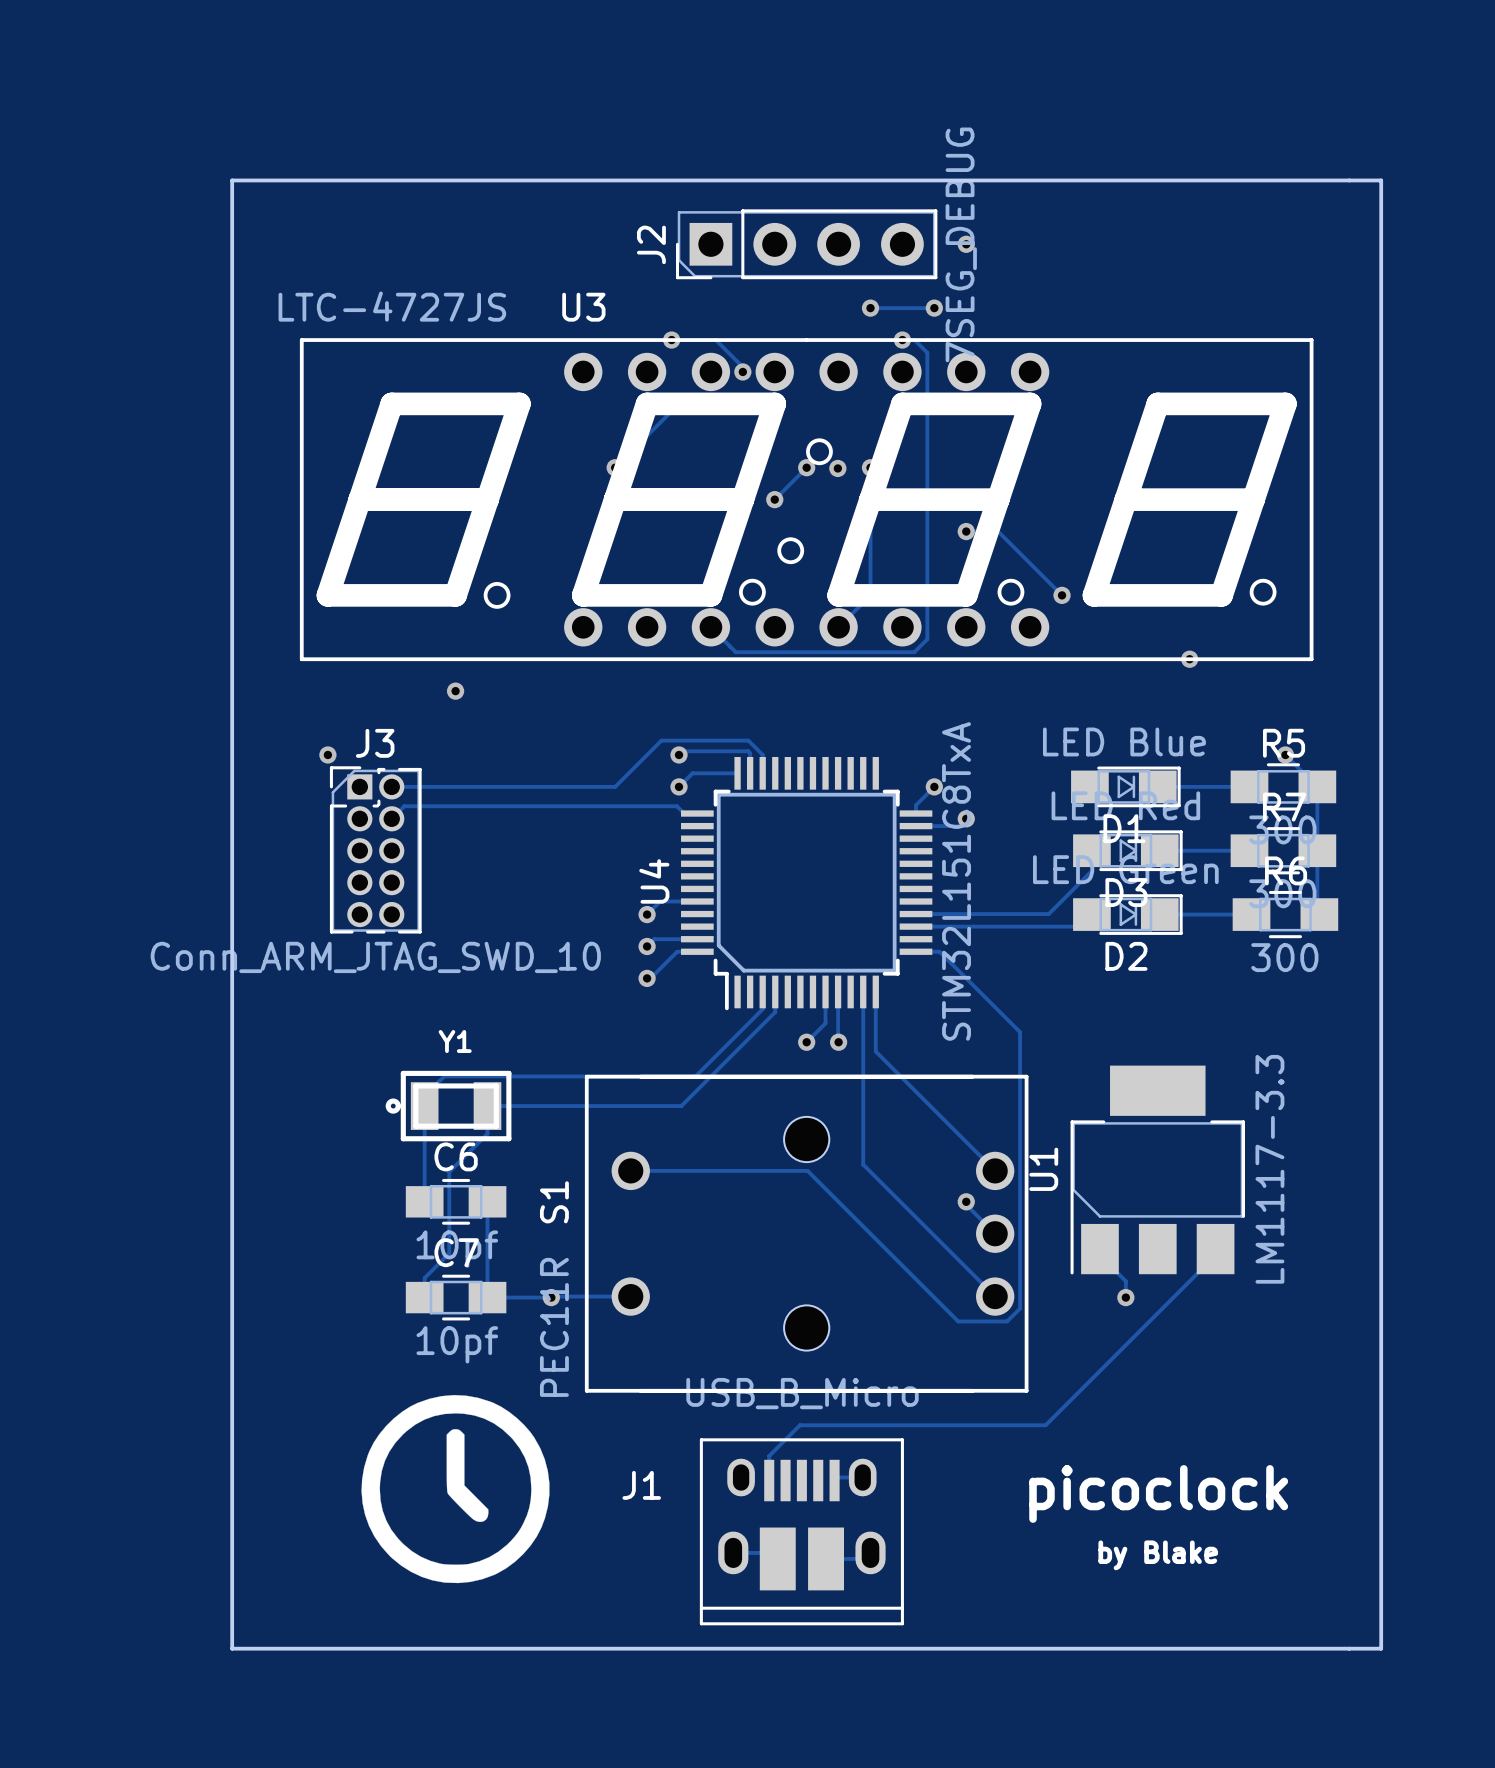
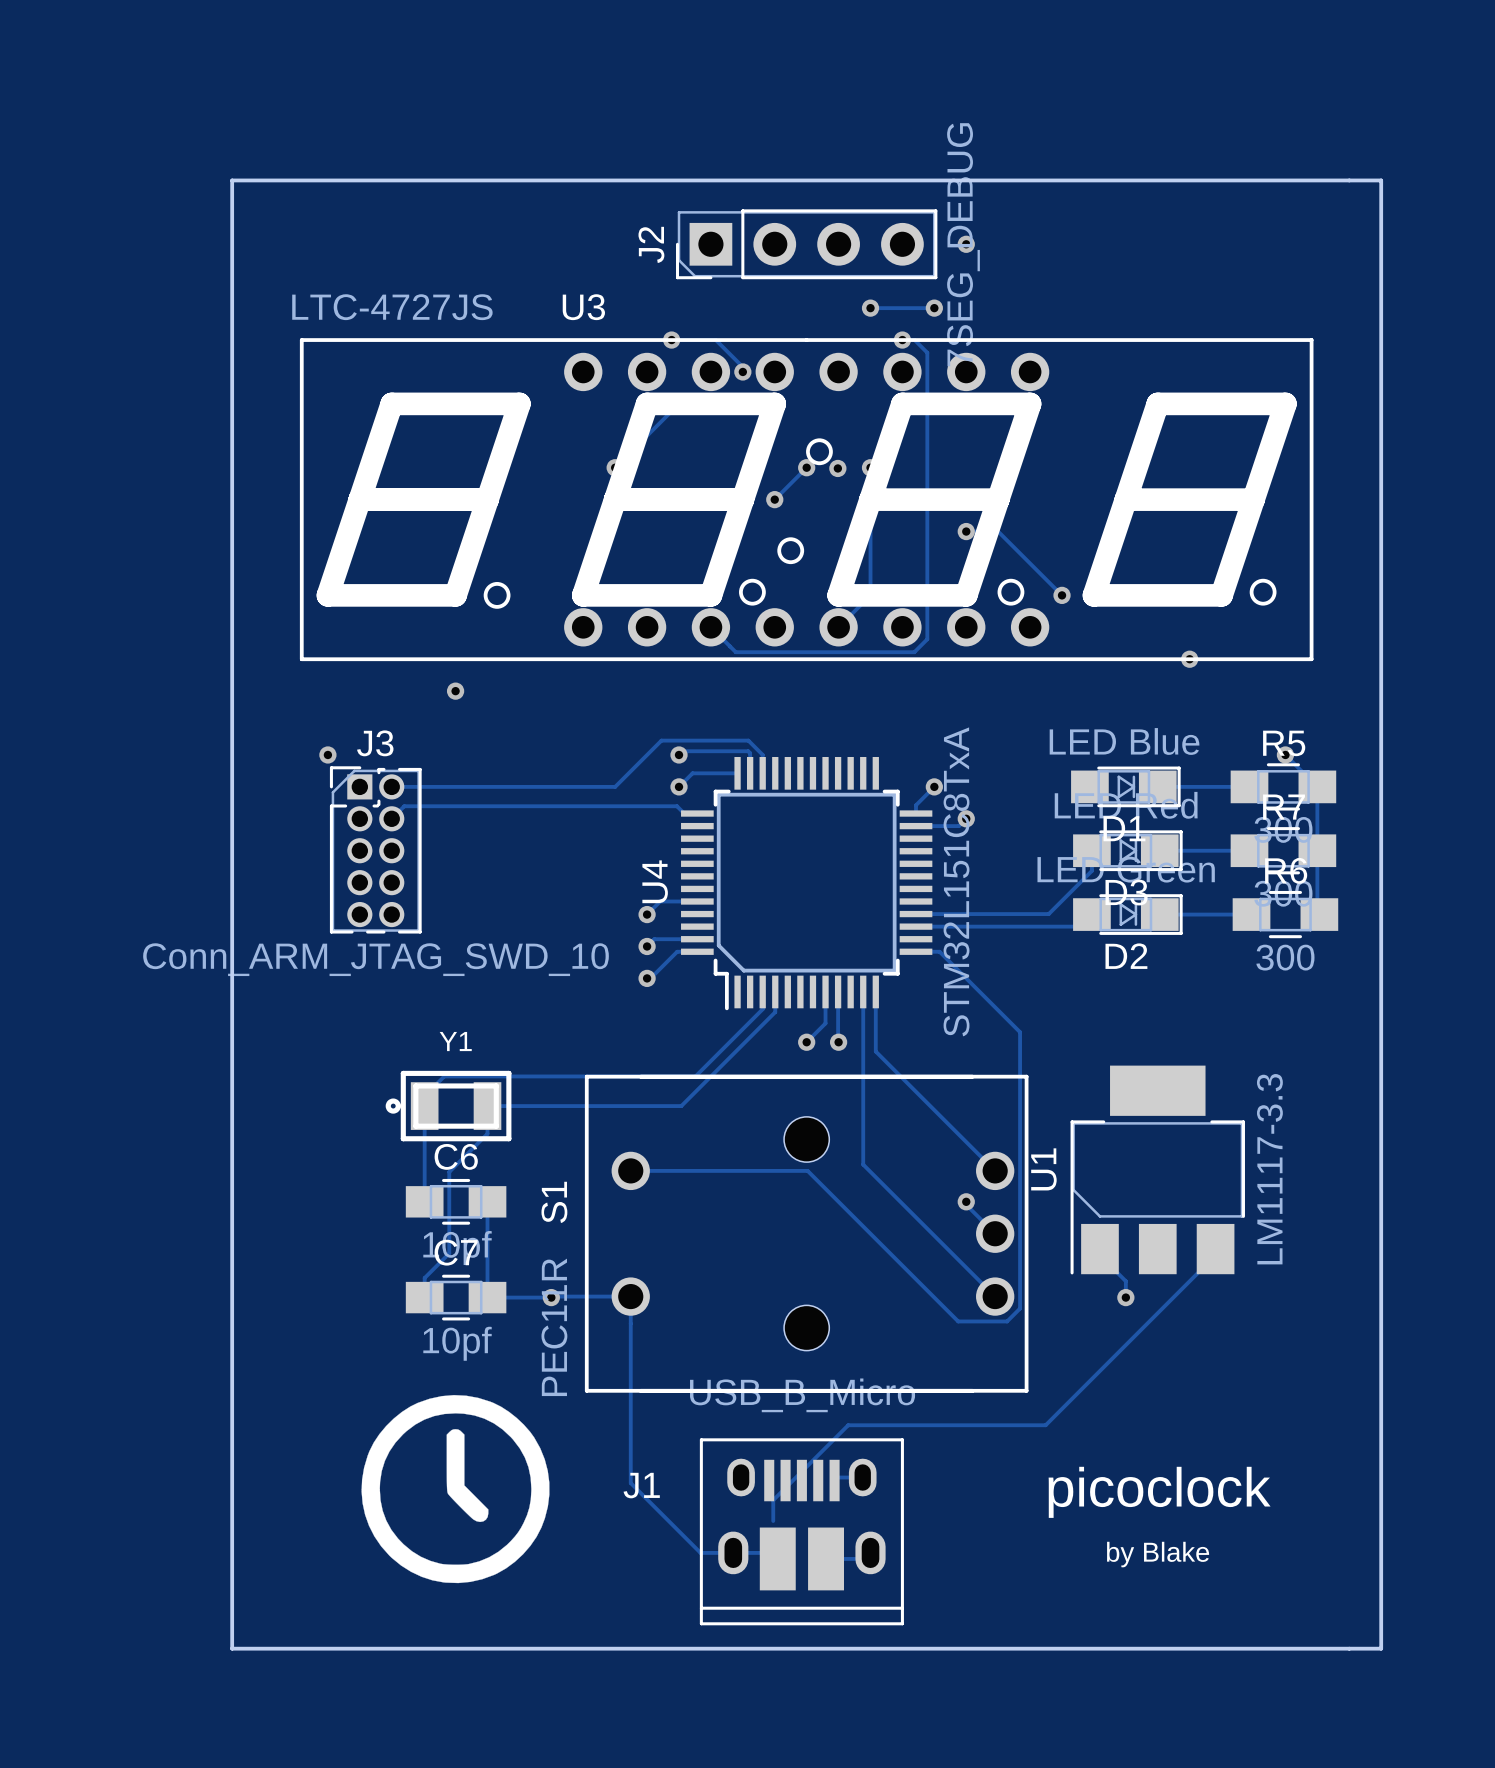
track: none -> (630, 1296) (630, 1483) (700, 1552) (733, 1552)
track: (848, 1425) (799, 1425) (769, 1455) (769, 1480) -> (848, 1425) (773, 1500) (773, 1521)

